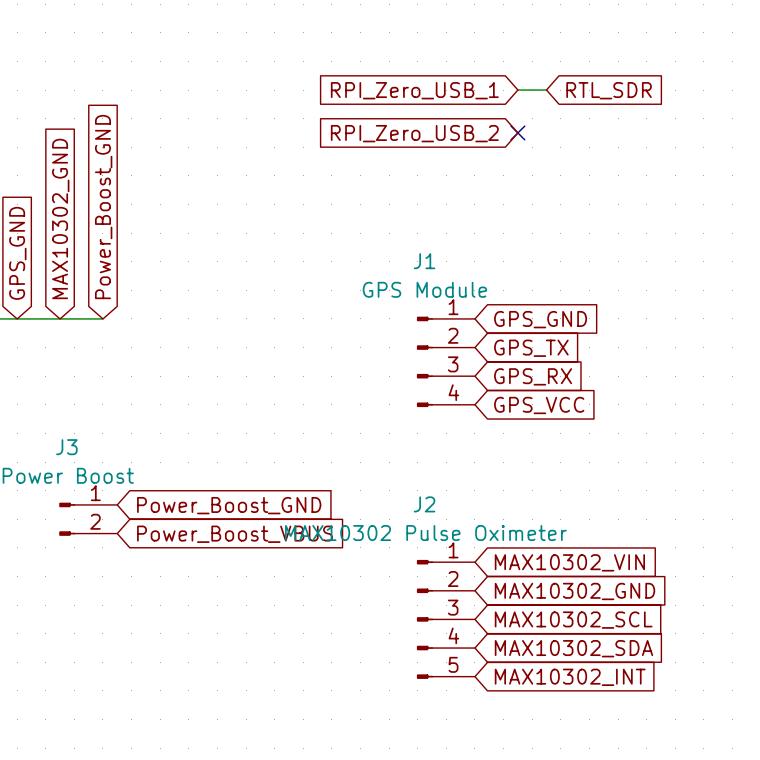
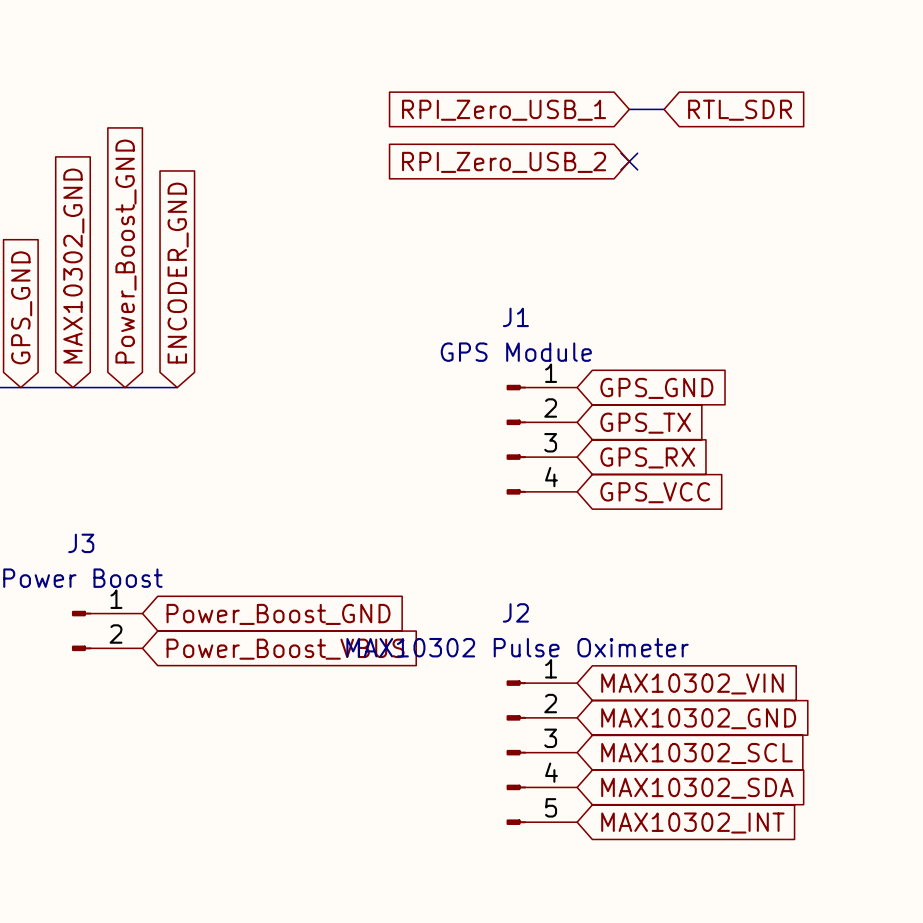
global label: none -> ENCODER_GND (178, 273)
wire: none -> (125, 387) (177, 387)

